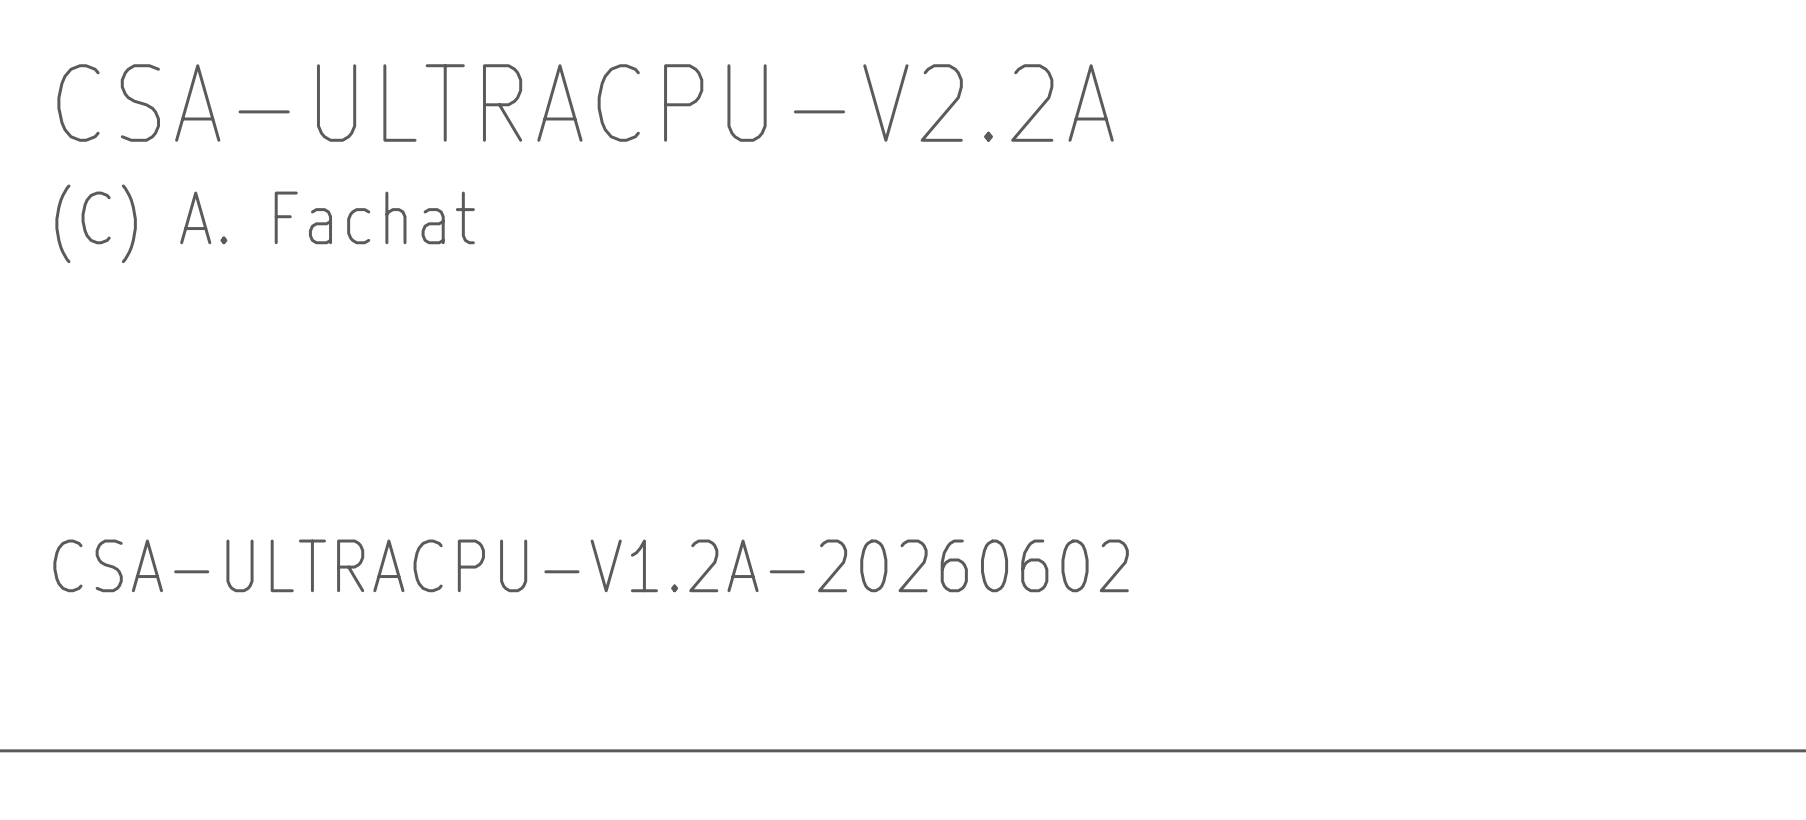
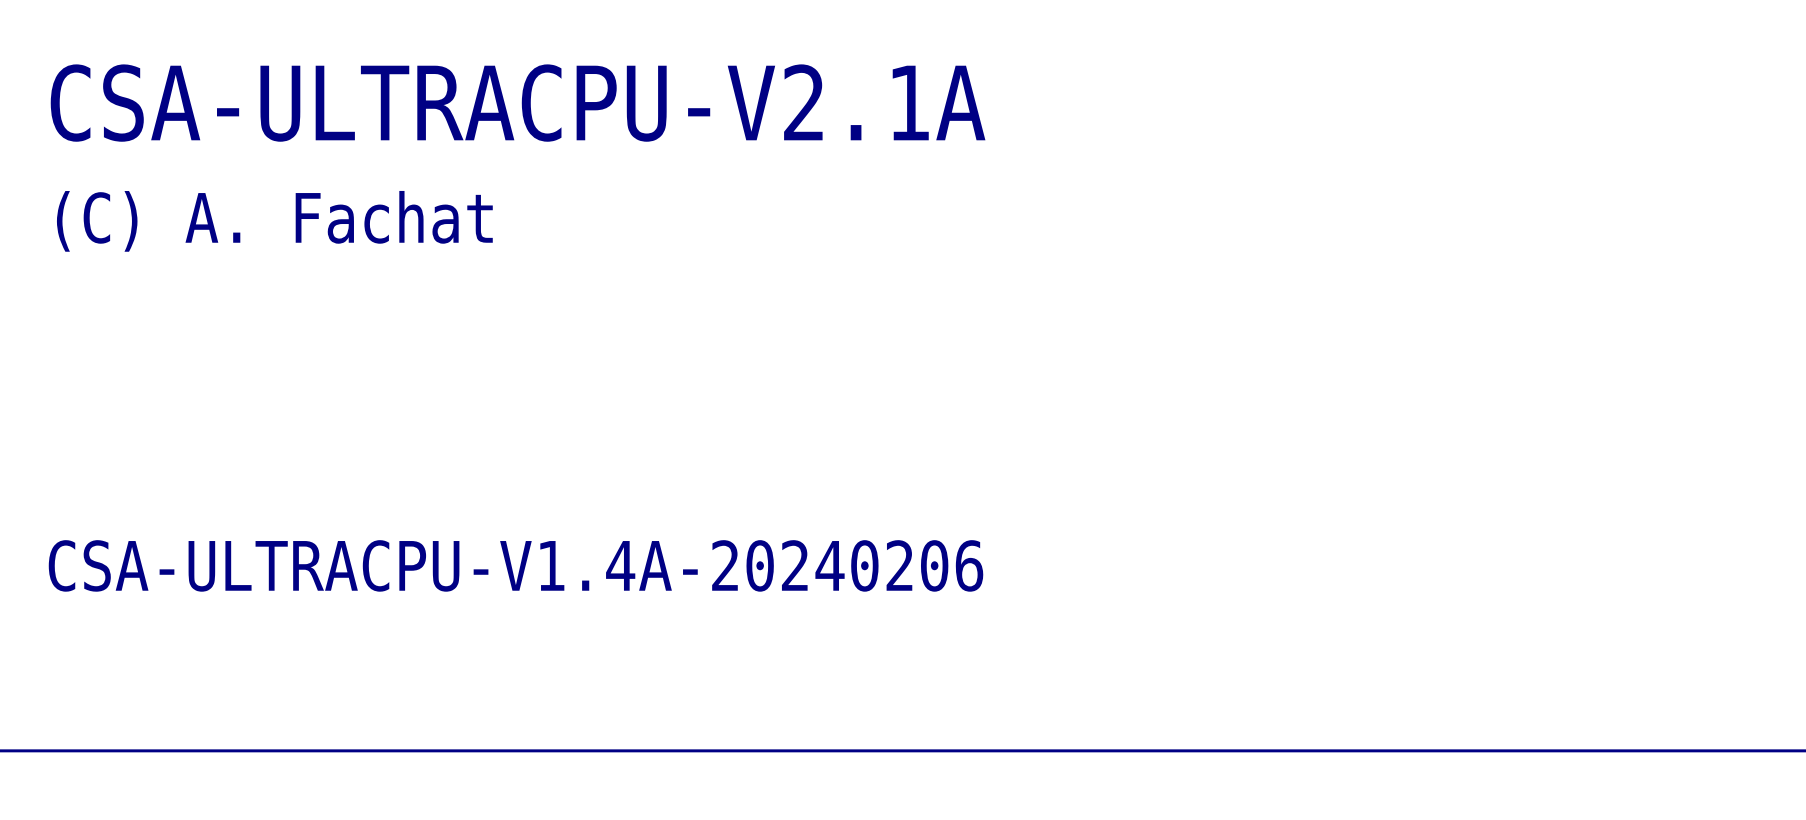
text: CSA-ULTRACPU-V2.2A (585, 103) -> CSA-ULTRACPU-V2.1A (518, 103)
text: CSA-ULTRACPU-V1.2A-20260602 (591, 565) -> CSA-ULTRACPU-V1.4A-20240206 (516, 565)

